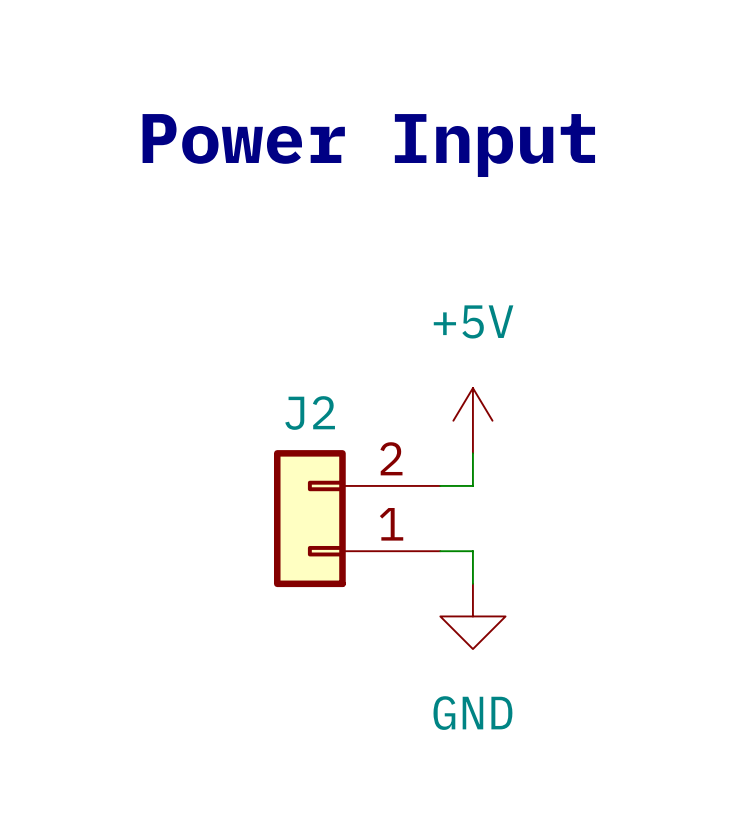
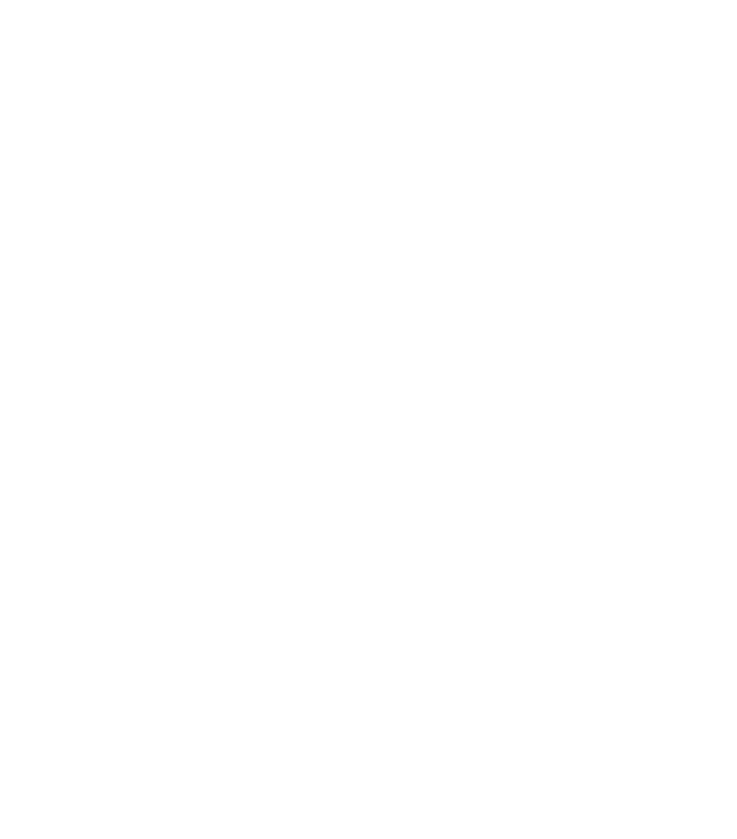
text: Power Input (368, 145) -> none
power symbol: +5V (472, 420) -> none
wire: (472, 453) (472, 485) (440, 485) -> none
J2: (357, 518) -> none
wire: (440, 551) (472, 551) (472, 583) -> none
power symbol: GND (472, 616) -> none

